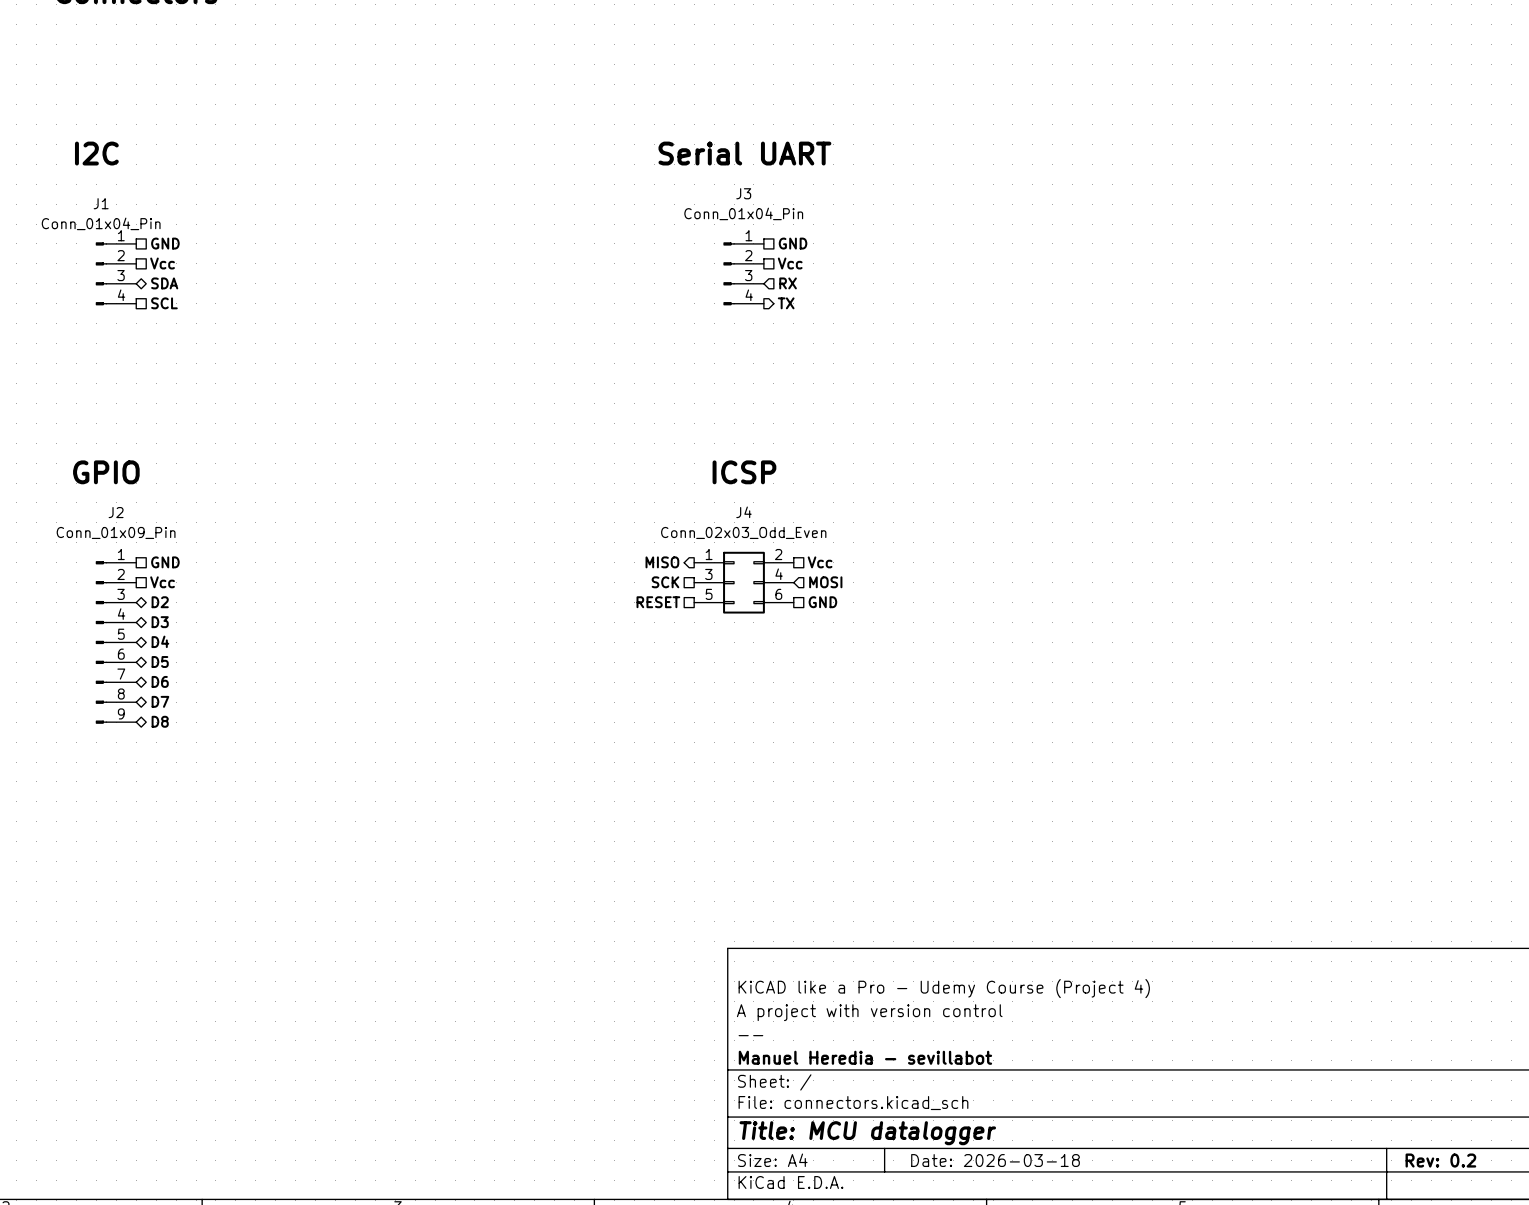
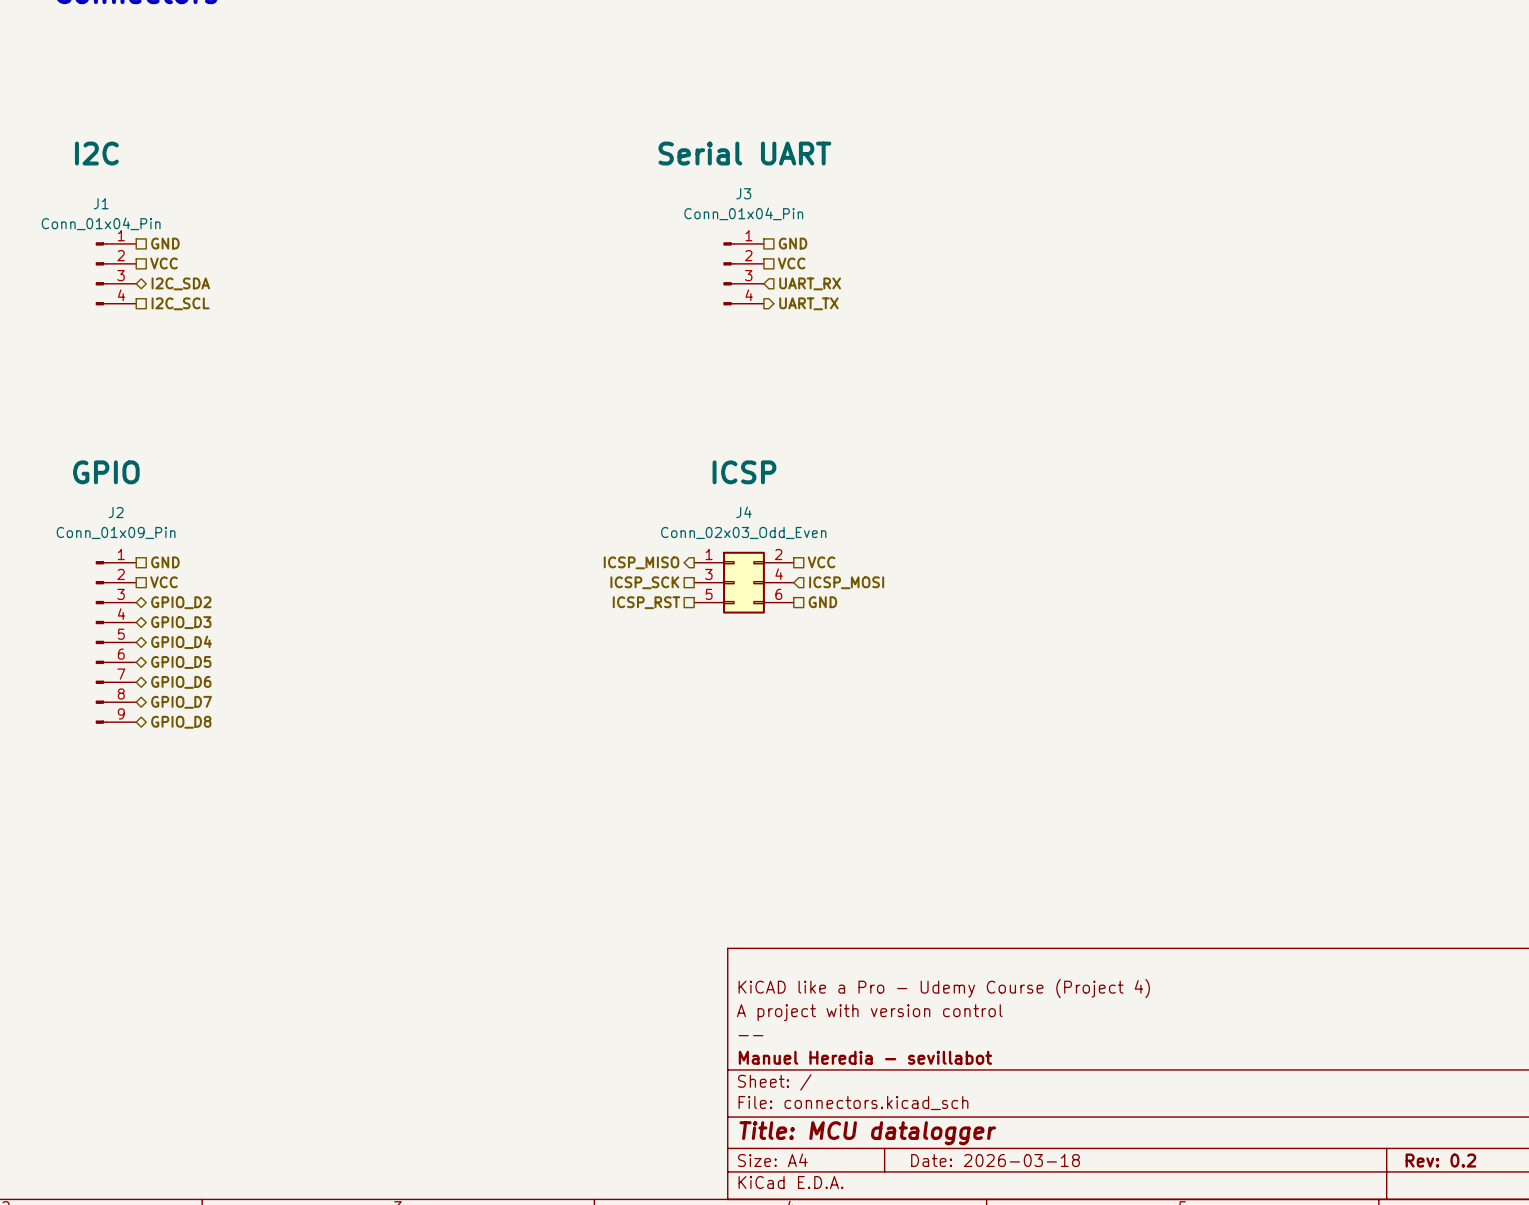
hierarchical label: Vcc (162, 263) -> VCC (163, 263)
hierarchical label: Vcc (790, 263) -> VCC (791, 263)
hierarchical label: SDA (164, 283) -> I2C_SDA (180, 283)
hierarchical label: RX (788, 283) -> UART_RX (810, 283)
hierarchical label: SCL (164, 303) -> I2C_SCL (180, 303)
hierarchical label: TX (786, 303) -> UART_TX (808, 303)
hierarchical label: MISO (662, 562) -> ICSP_MISO (641, 562)
hierarchical label: Vcc (820, 562) -> VCC (821, 562)
hierarchical label: Vcc (162, 582) -> VCC (163, 582)
hierarchical label: SCK (665, 582) -> ICSP_SCK (644, 582)
hierarchical label: MOSI (825, 582) -> ICSP_MOSI (846, 582)
hierarchical label: D2 (160, 602) -> GPIO_D2 (181, 602)
hierarchical label: RESET (658, 602) -> ICSP_RST (646, 602)
hierarchical label: D3 (160, 622) -> GPIO_D3 (181, 622)
hierarchical label: D4 (160, 641) -> GPIO_D4 (181, 642)
hierarchical label: D5 (160, 662) -> GPIO_D5 (181, 662)
hierarchical label: D6 (160, 681) -> GPIO_D6 (181, 682)
hierarchical label: D7 (160, 701) -> GPIO_D7 (181, 702)
hierarchical label: D8 (160, 721) -> GPIO_D8 (181, 722)

